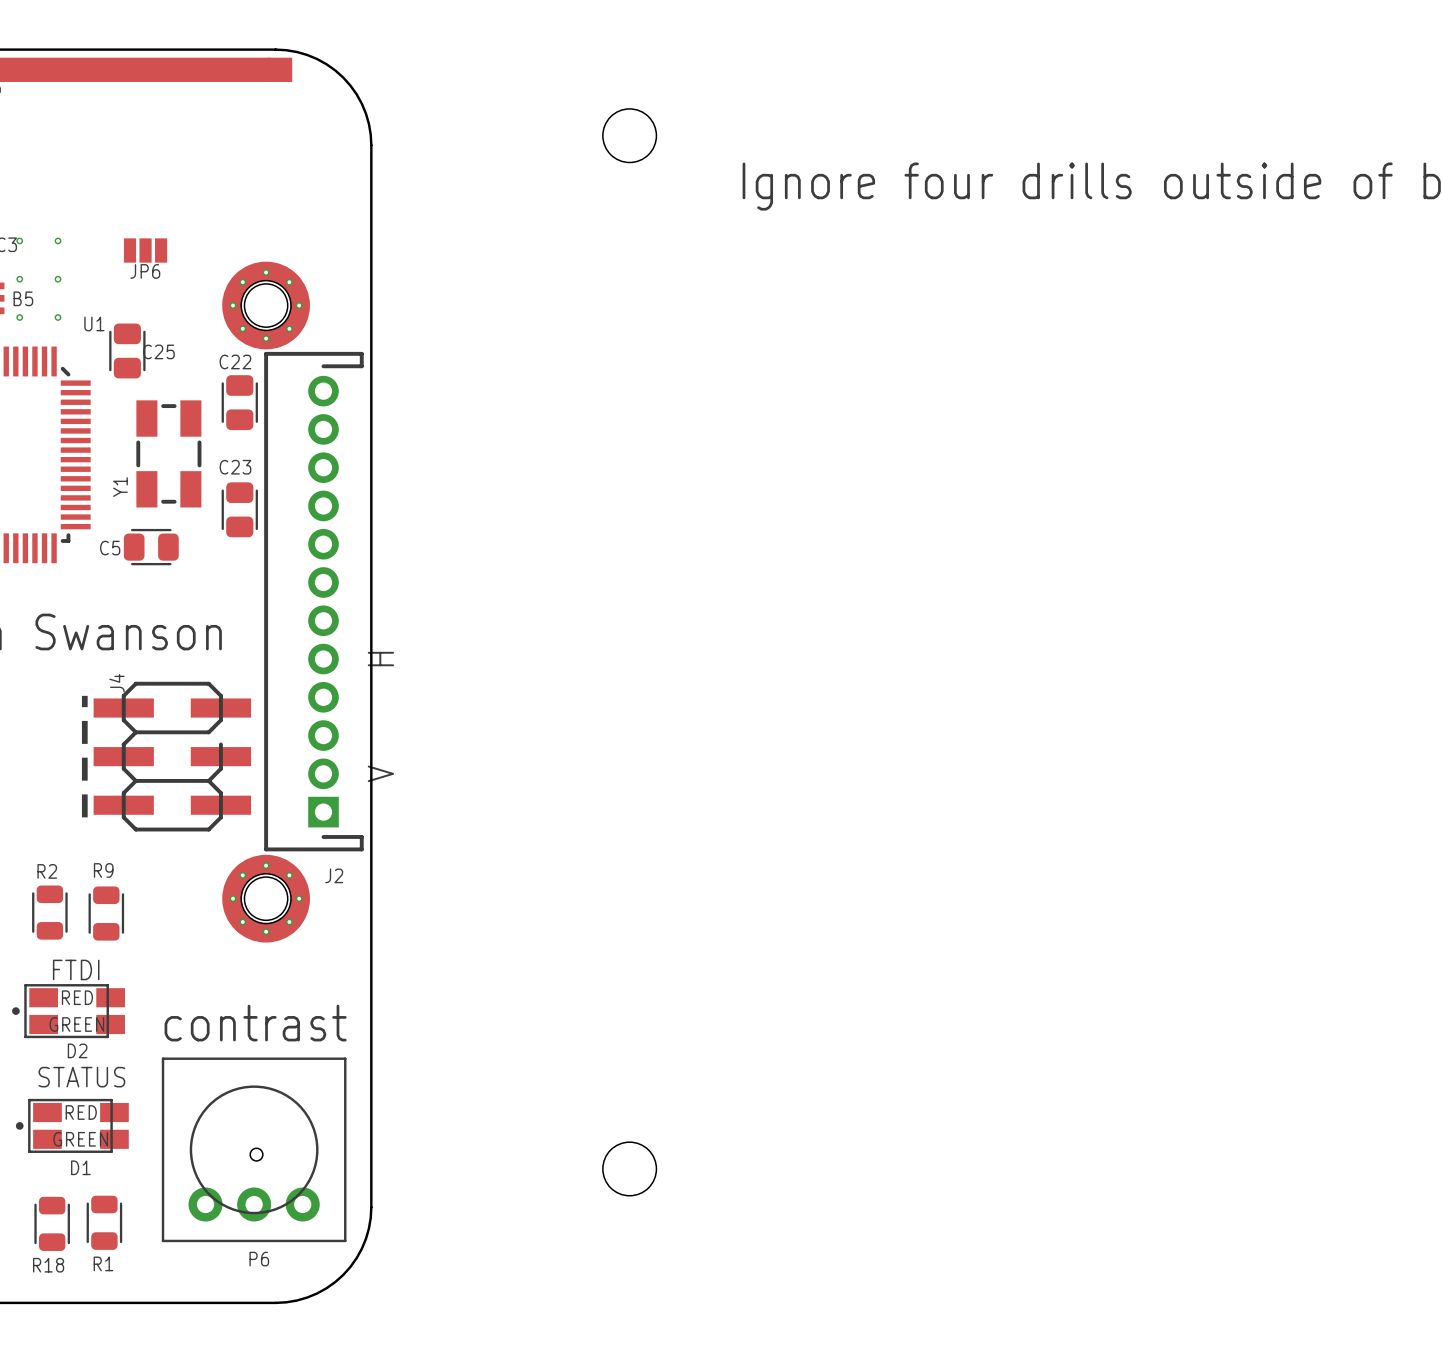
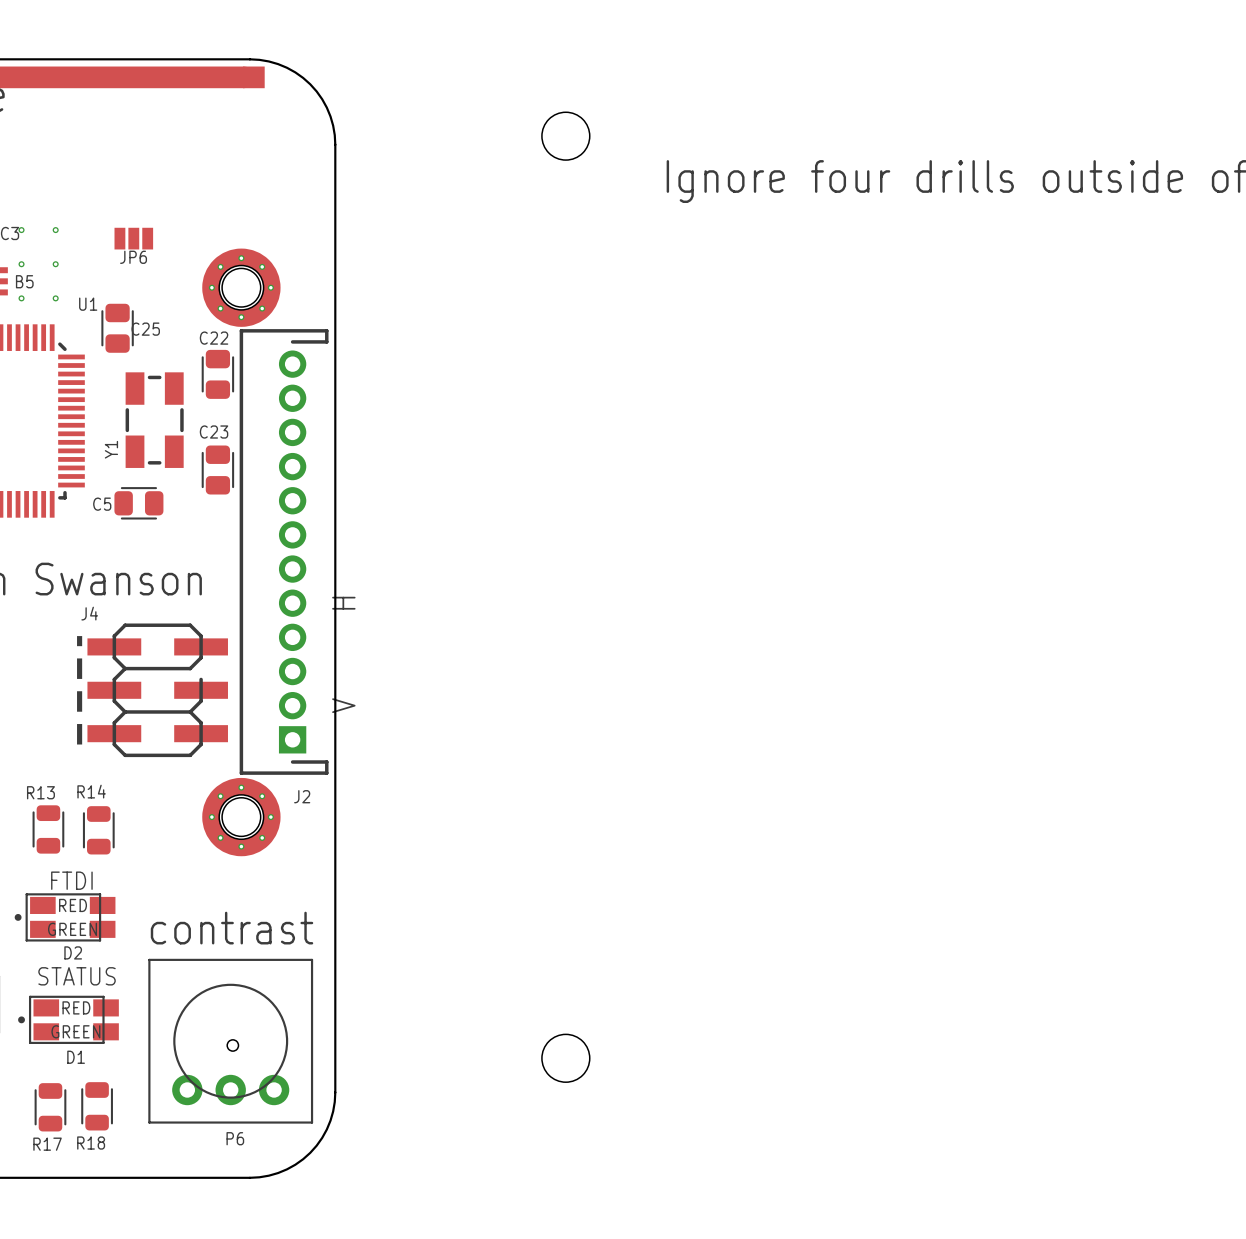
J4 name rotation: 0° (117, 683) -> 90° clockwise (89, 613)
R9 name: R9 (103, 870) -> R14 (91, 791)
R2 name: R2 (47, 871) -> R13 (40, 792)
R1 name: R1 (103, 1263) -> R18 (91, 1143)
R18 name: R18 (48, 1265) -> R17 (47, 1144)

